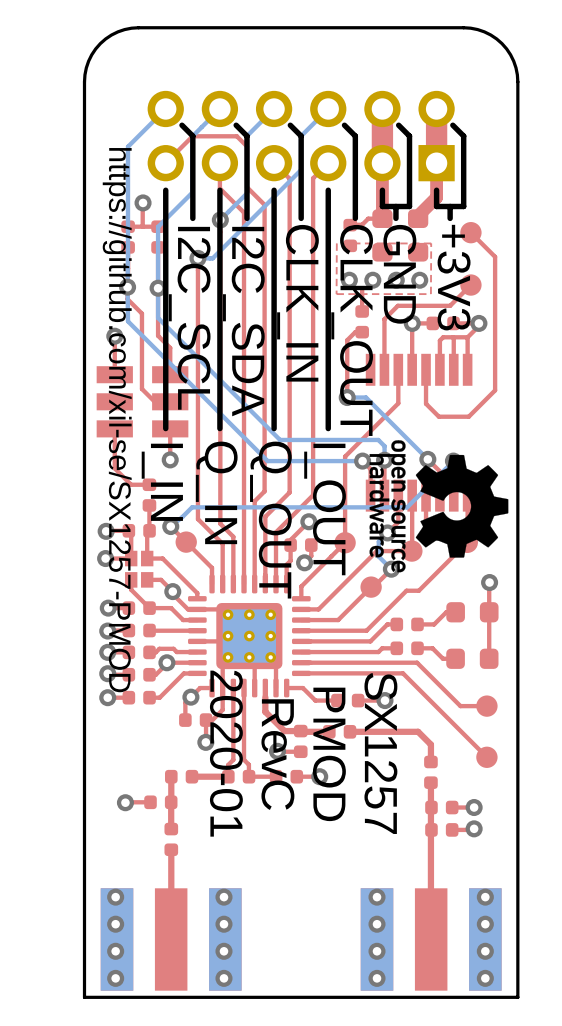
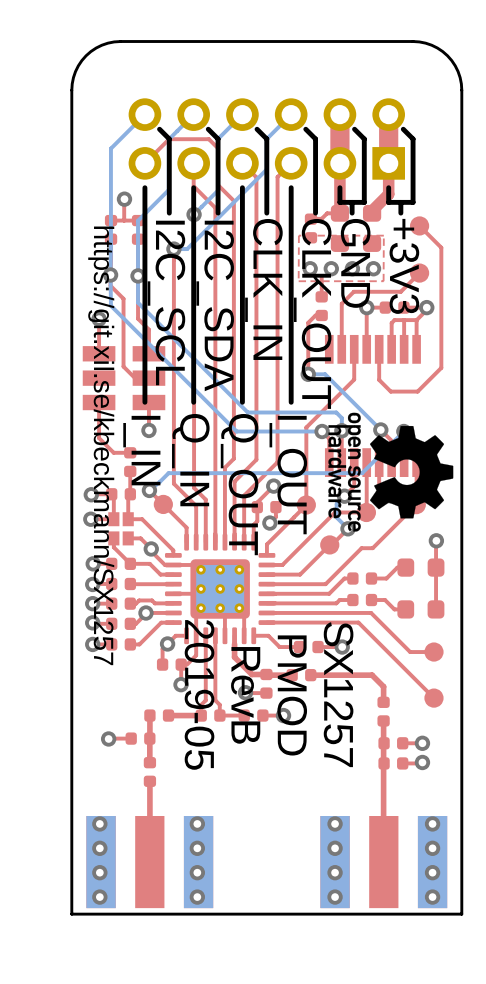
text: https://github.com/xil-se/SX1257-PMOD (117, 420) -> https://git.xil.se/kbeckmann/SX1257 (101, 445)
text: 2020-01 (226, 753) -> 2019-05 (199, 694)
text: RevC (277, 754) -> RevB (245, 695)

